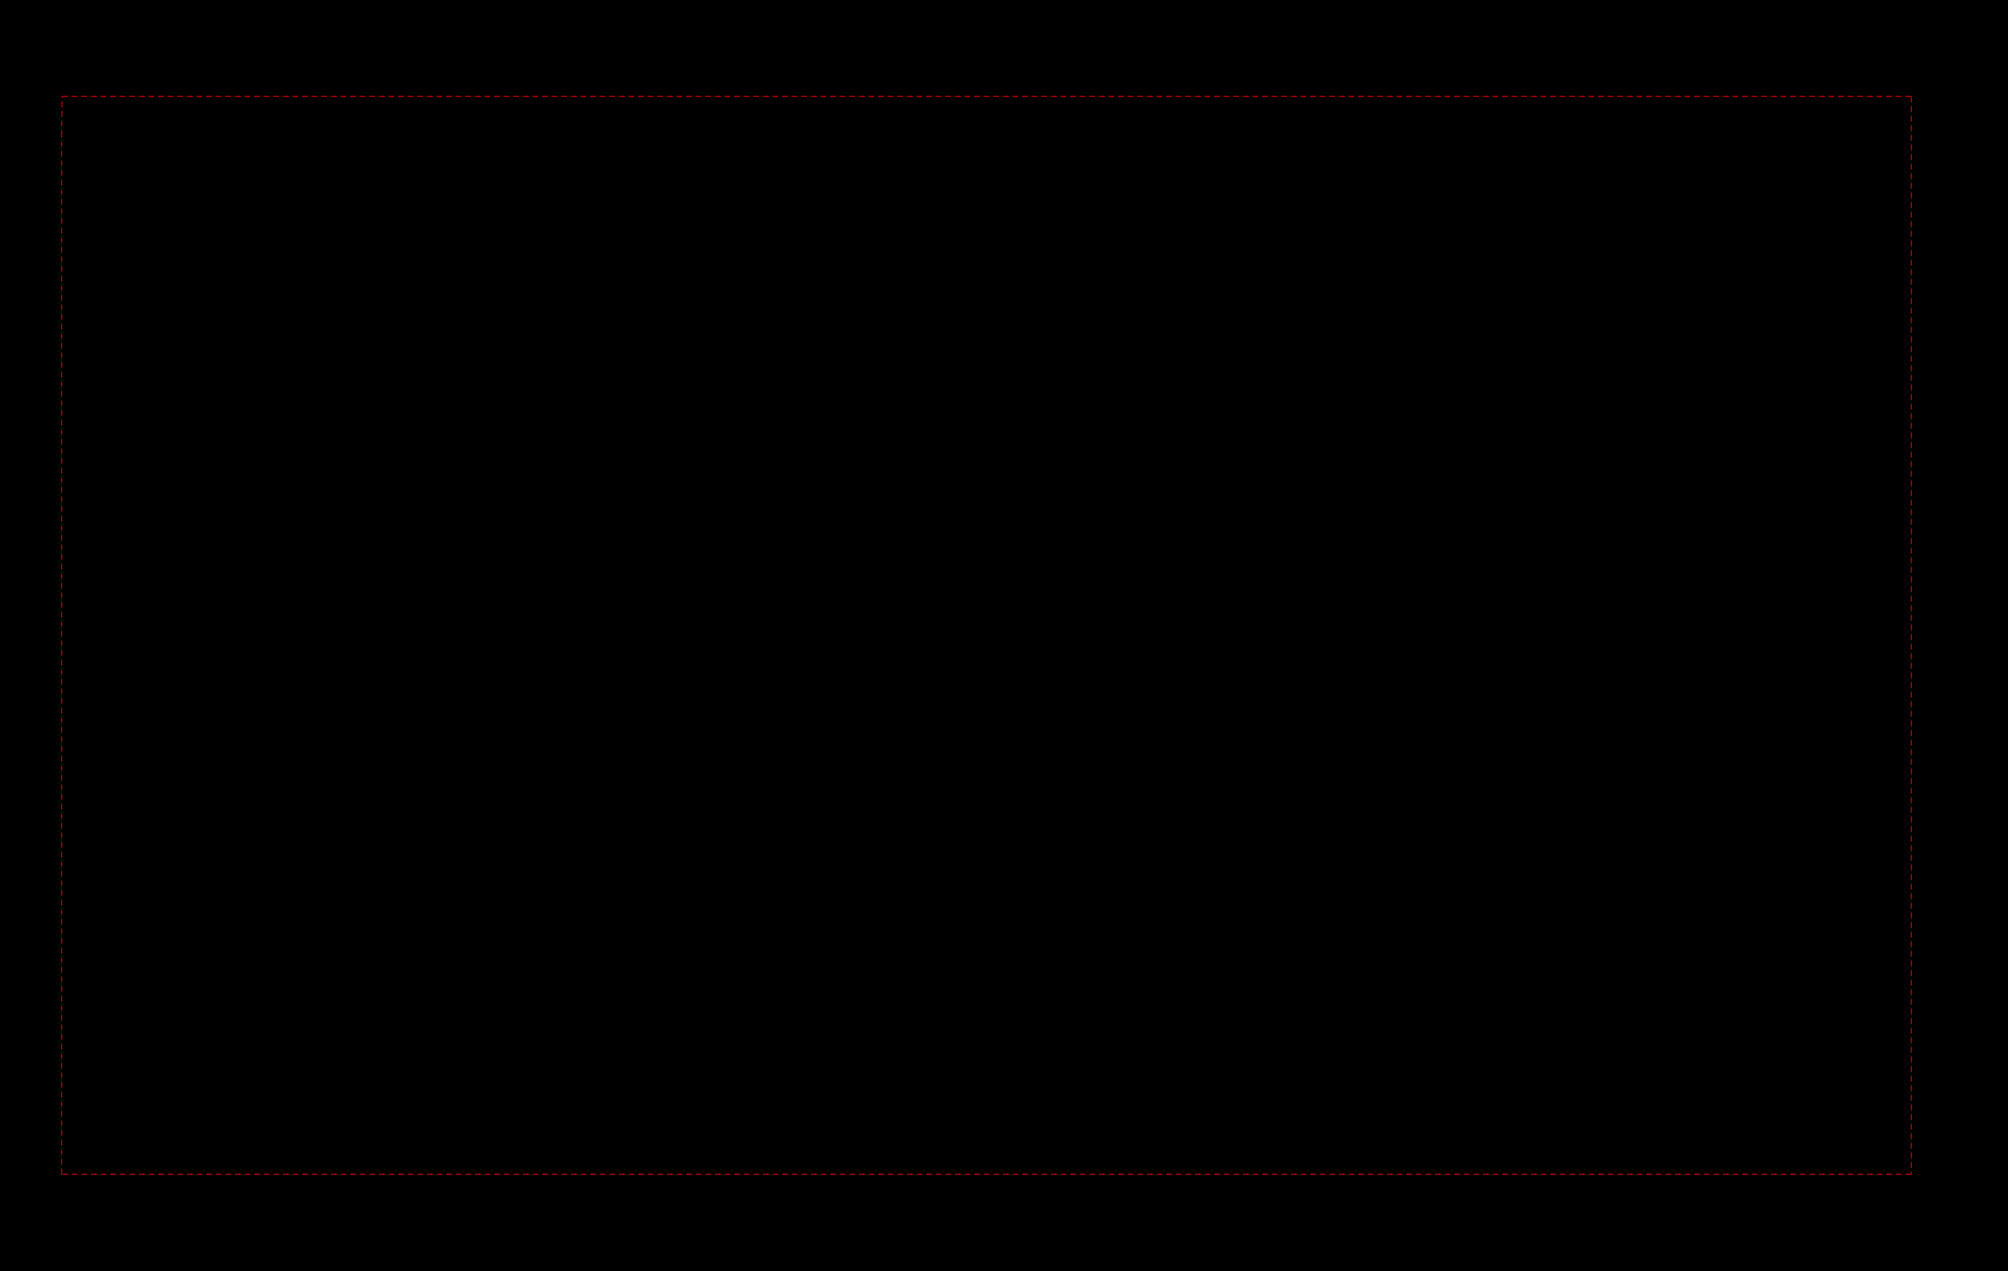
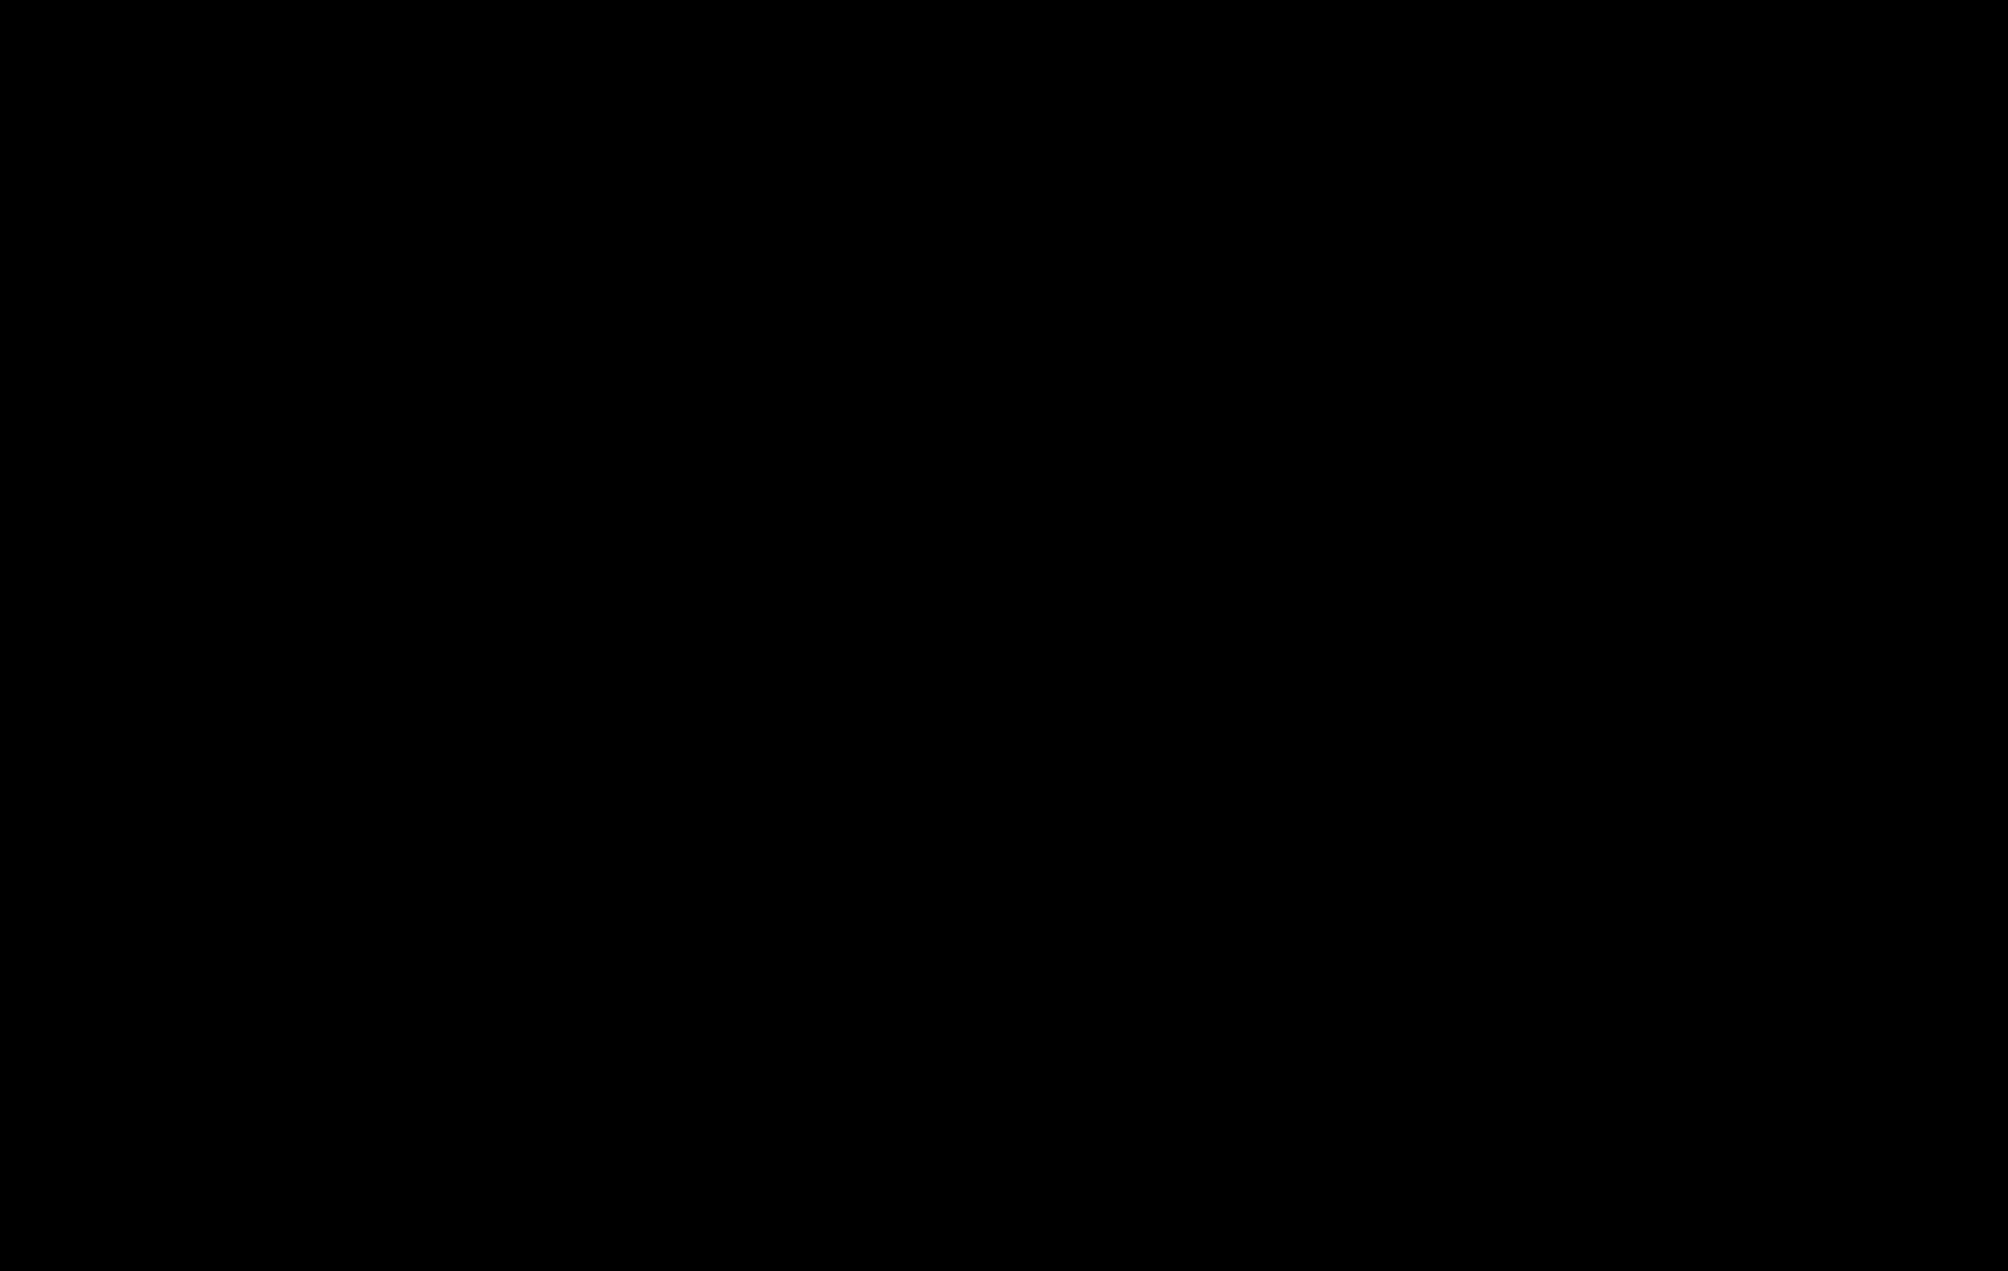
zone outline: (62, 96) (61, 1174) (1911, 1174) (1911, 96) (62, 96) -> none

